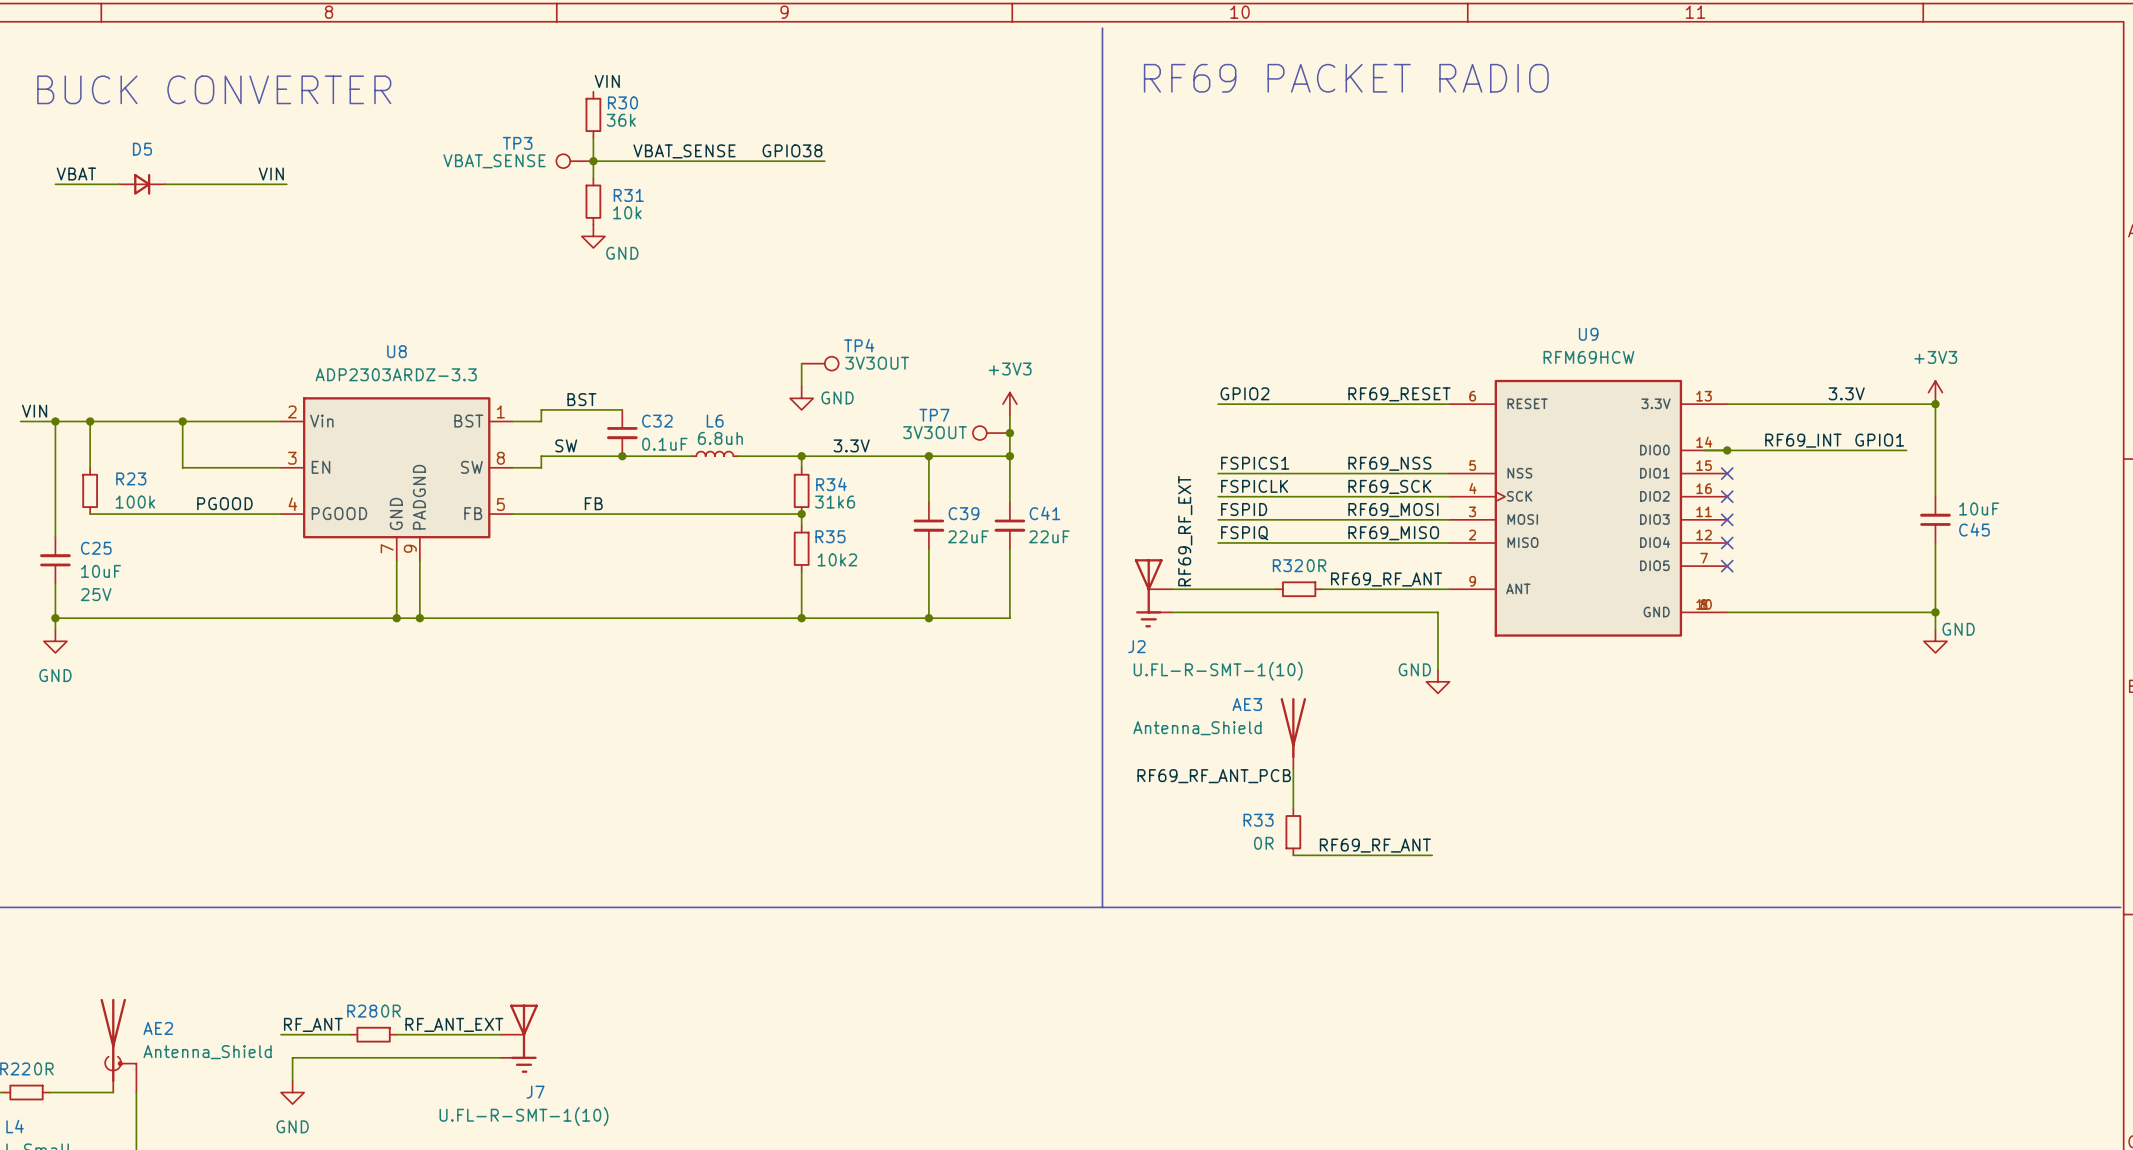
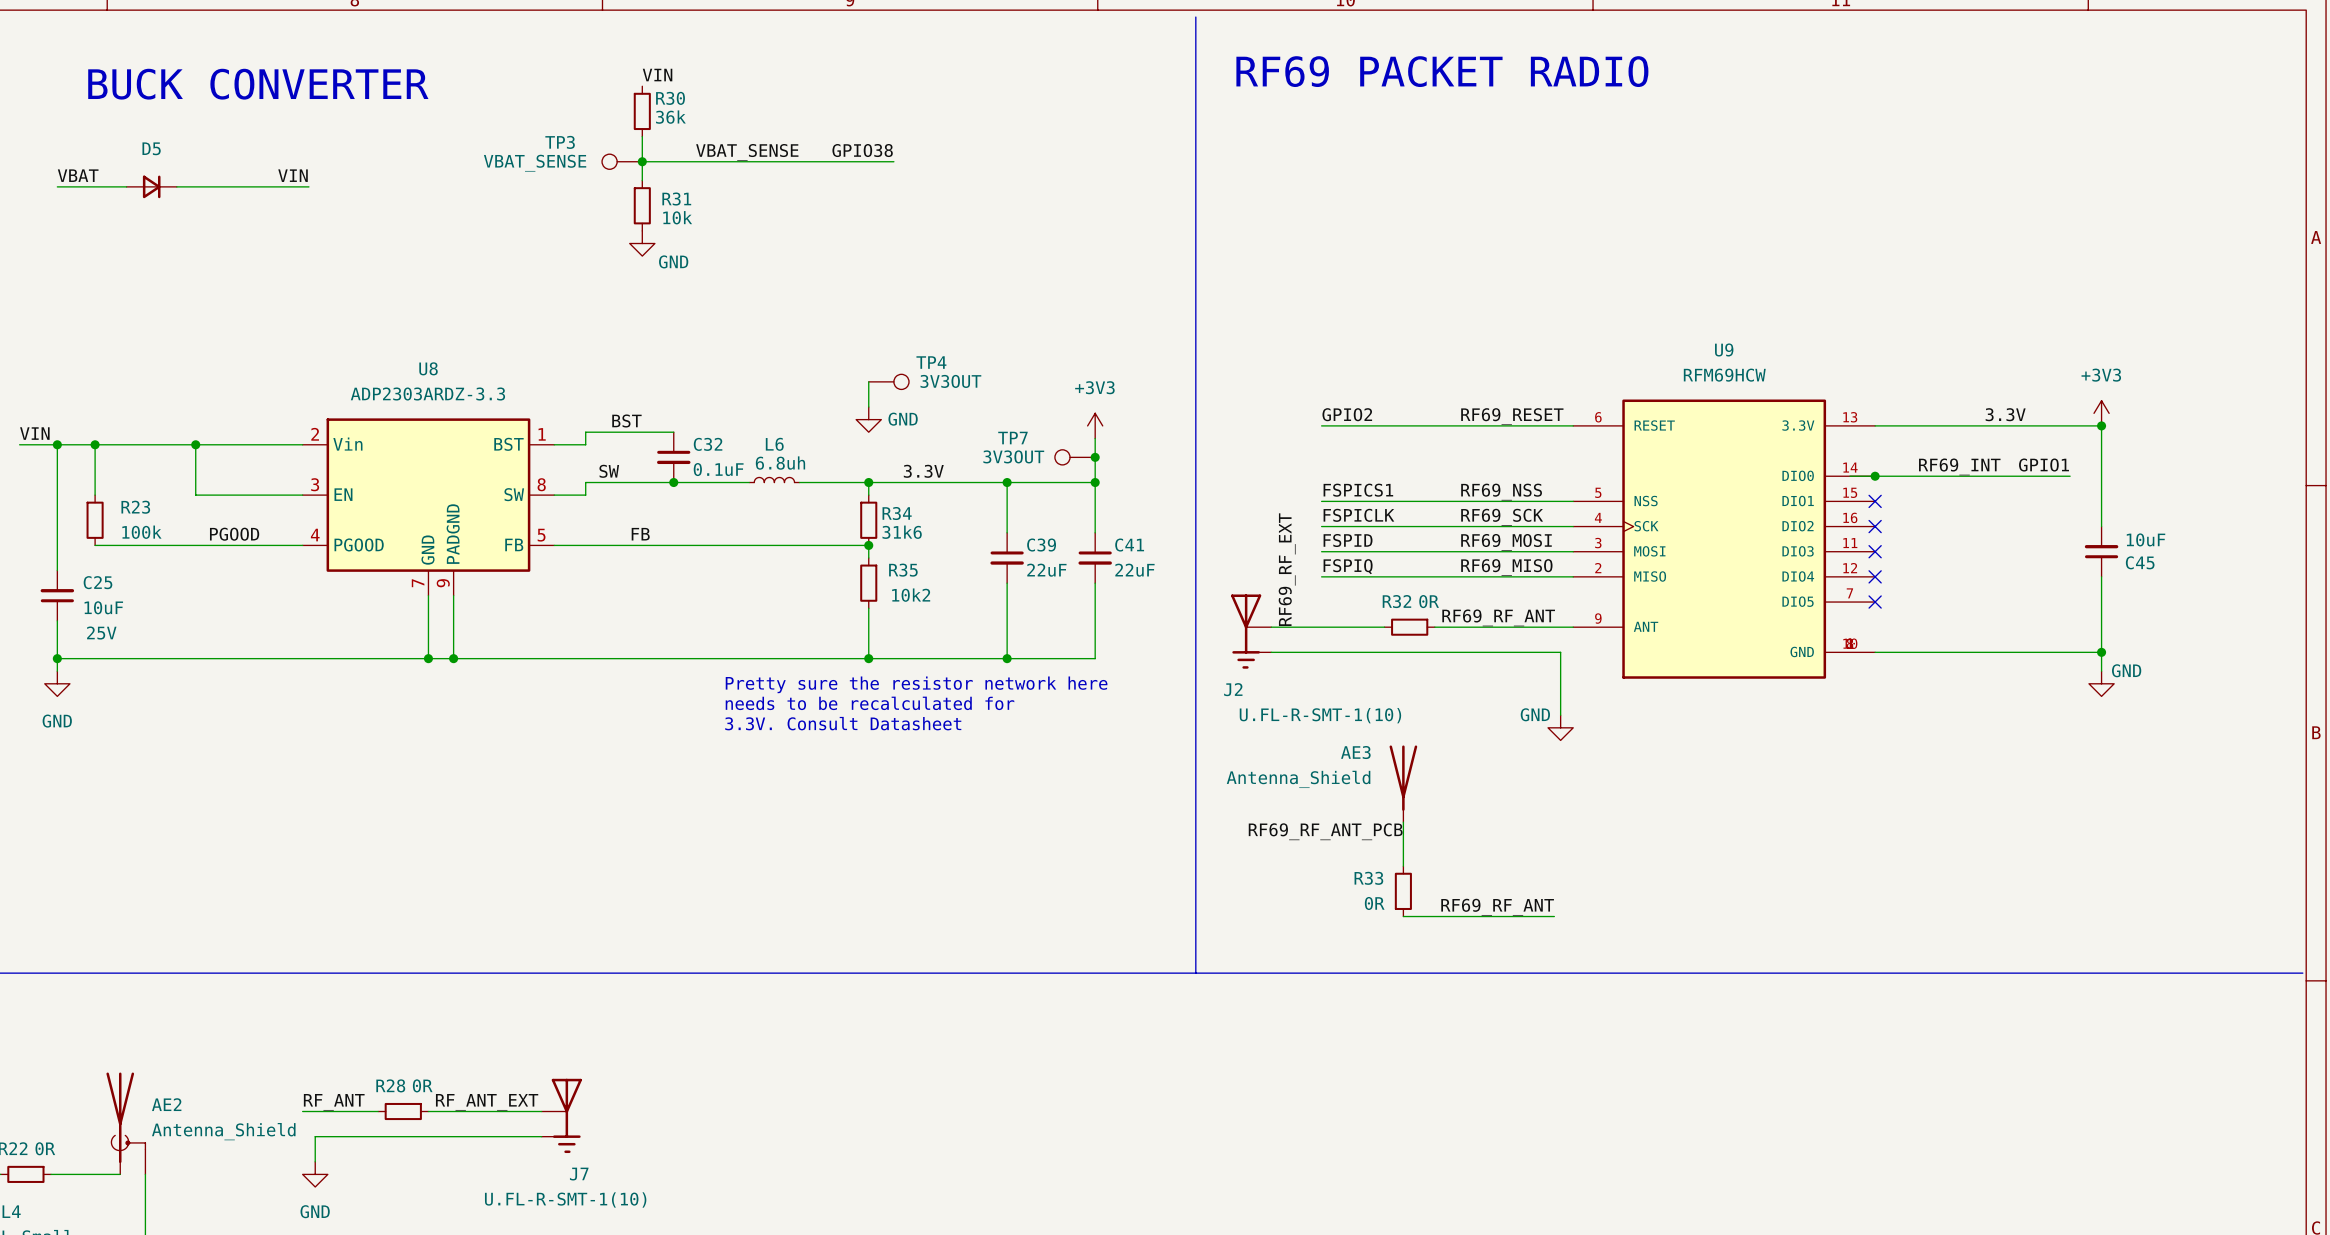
text: none -> Pretty sure the resistor network here (916, 684)
text: none -> needs to be recalculated for (870, 703)
text: none -> 3.3V. Consult Datasheet (843, 723)

